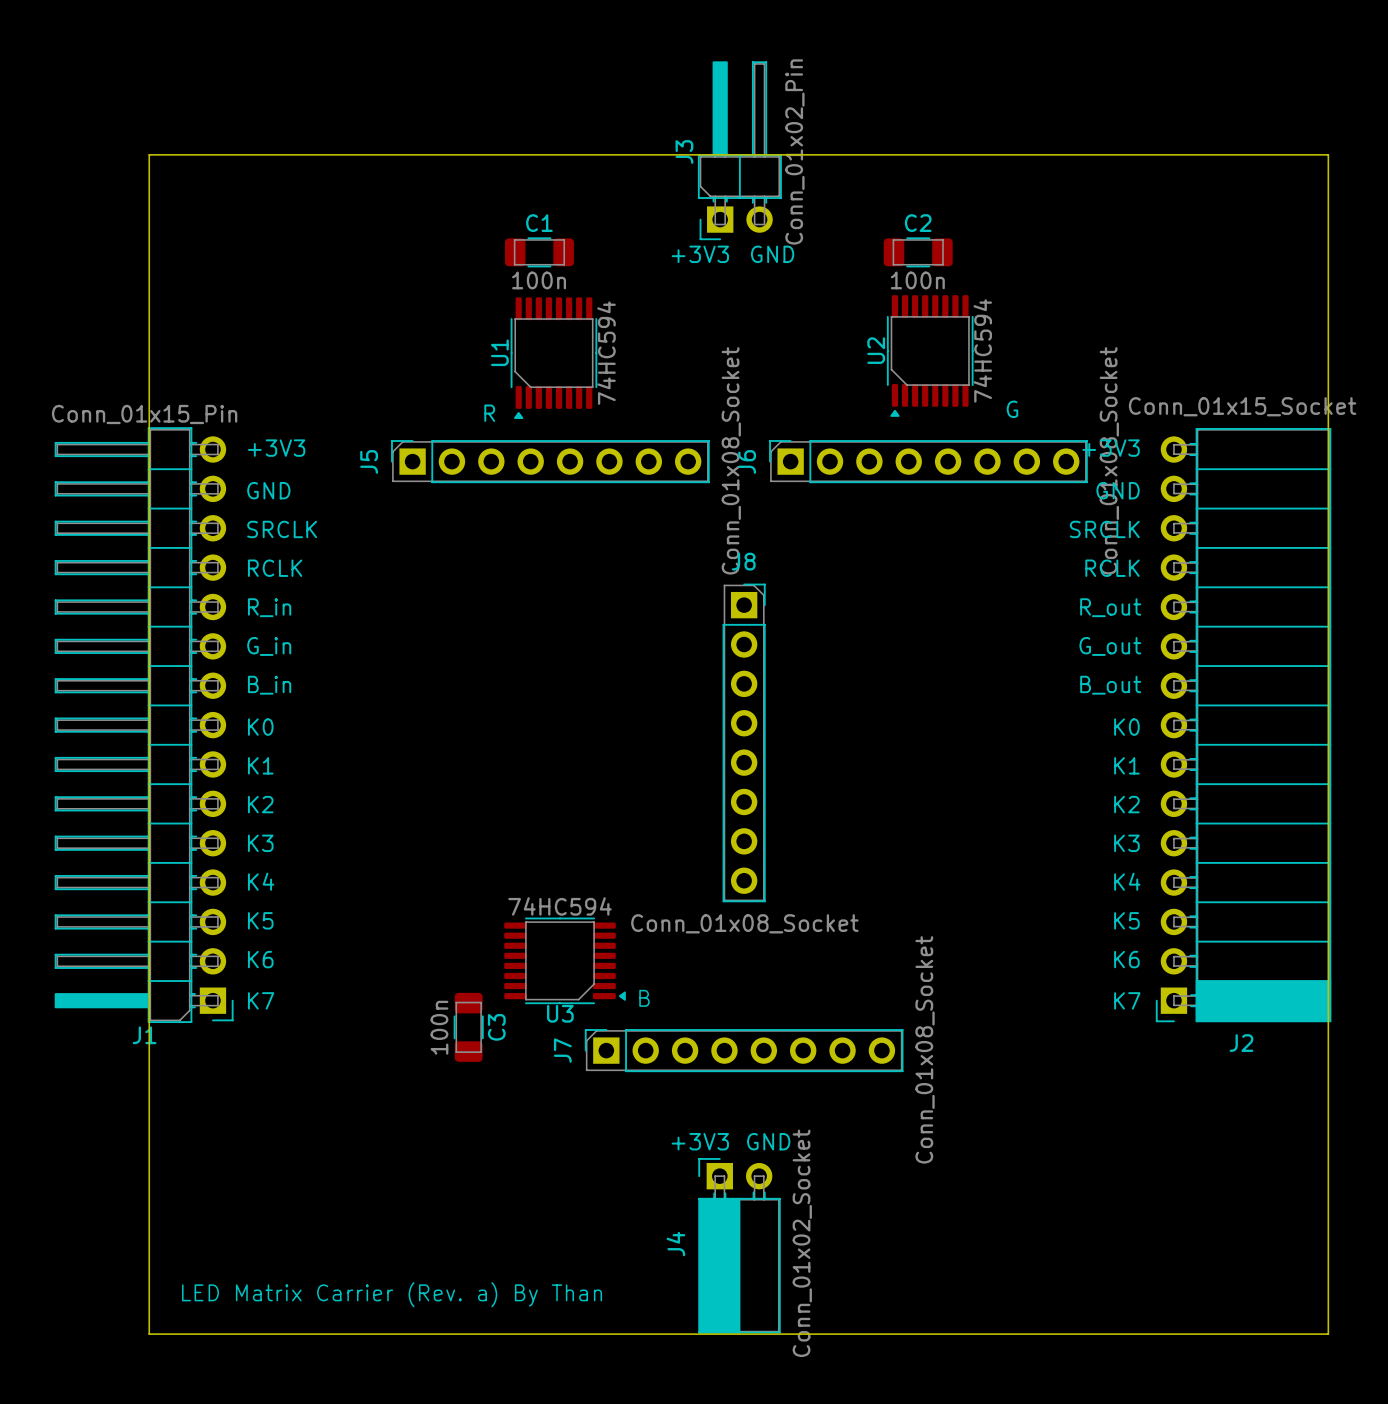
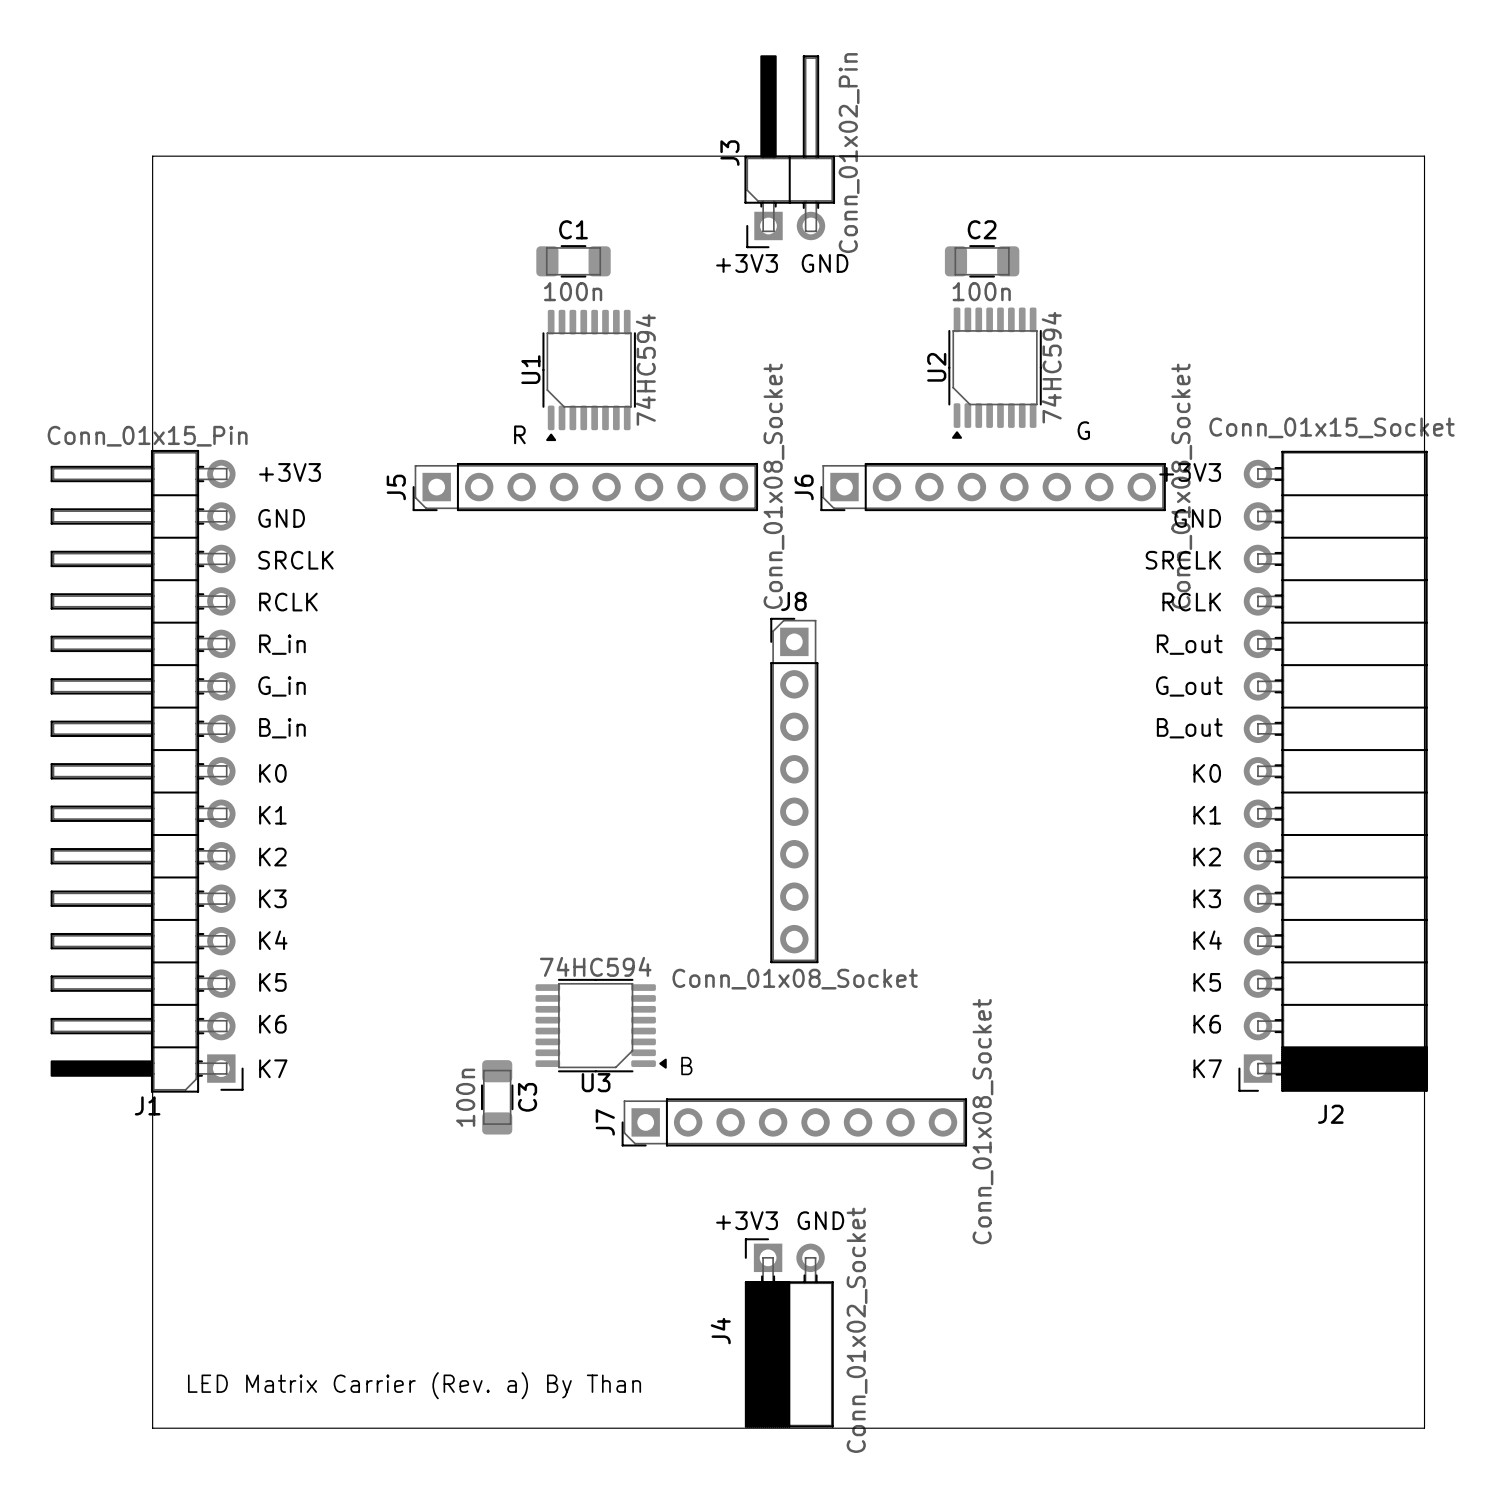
J5 footprint: [391, 440, 710, 484] -> [412, 462, 759, 512]
J6 footprint: [769, 440, 1088, 484] -> [820, 462, 1166, 512]
J8 footprint: [722, 583, 766, 903] -> [770, 617, 819, 964]
J7 footprint: [584, 1029, 904, 1073] -> [621, 1098, 968, 1147]

